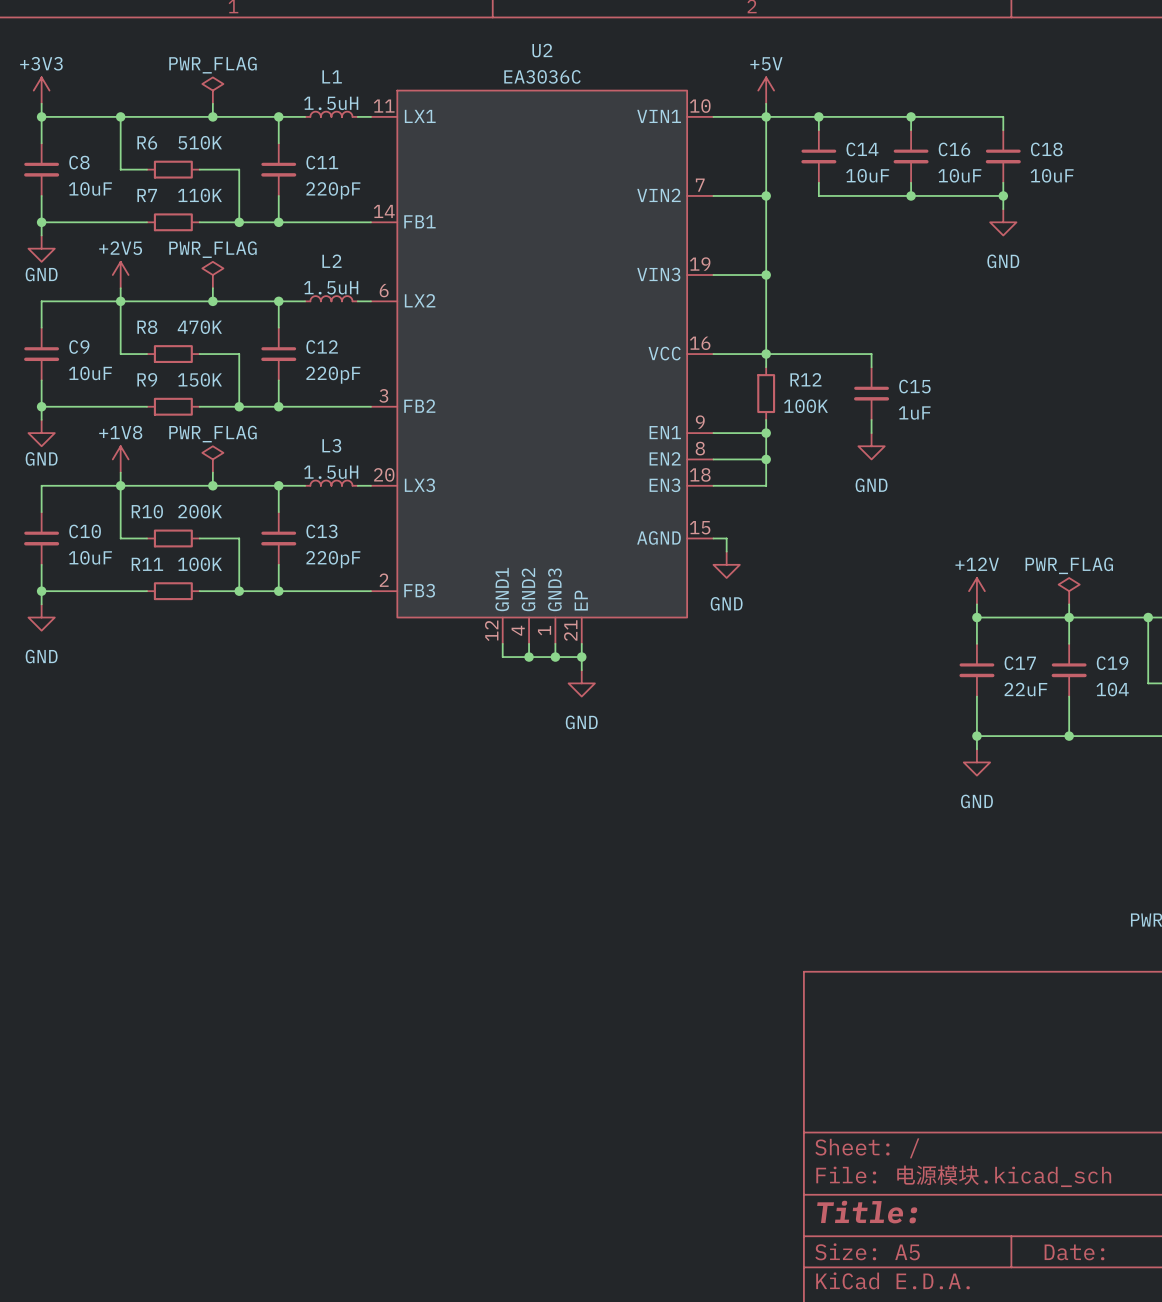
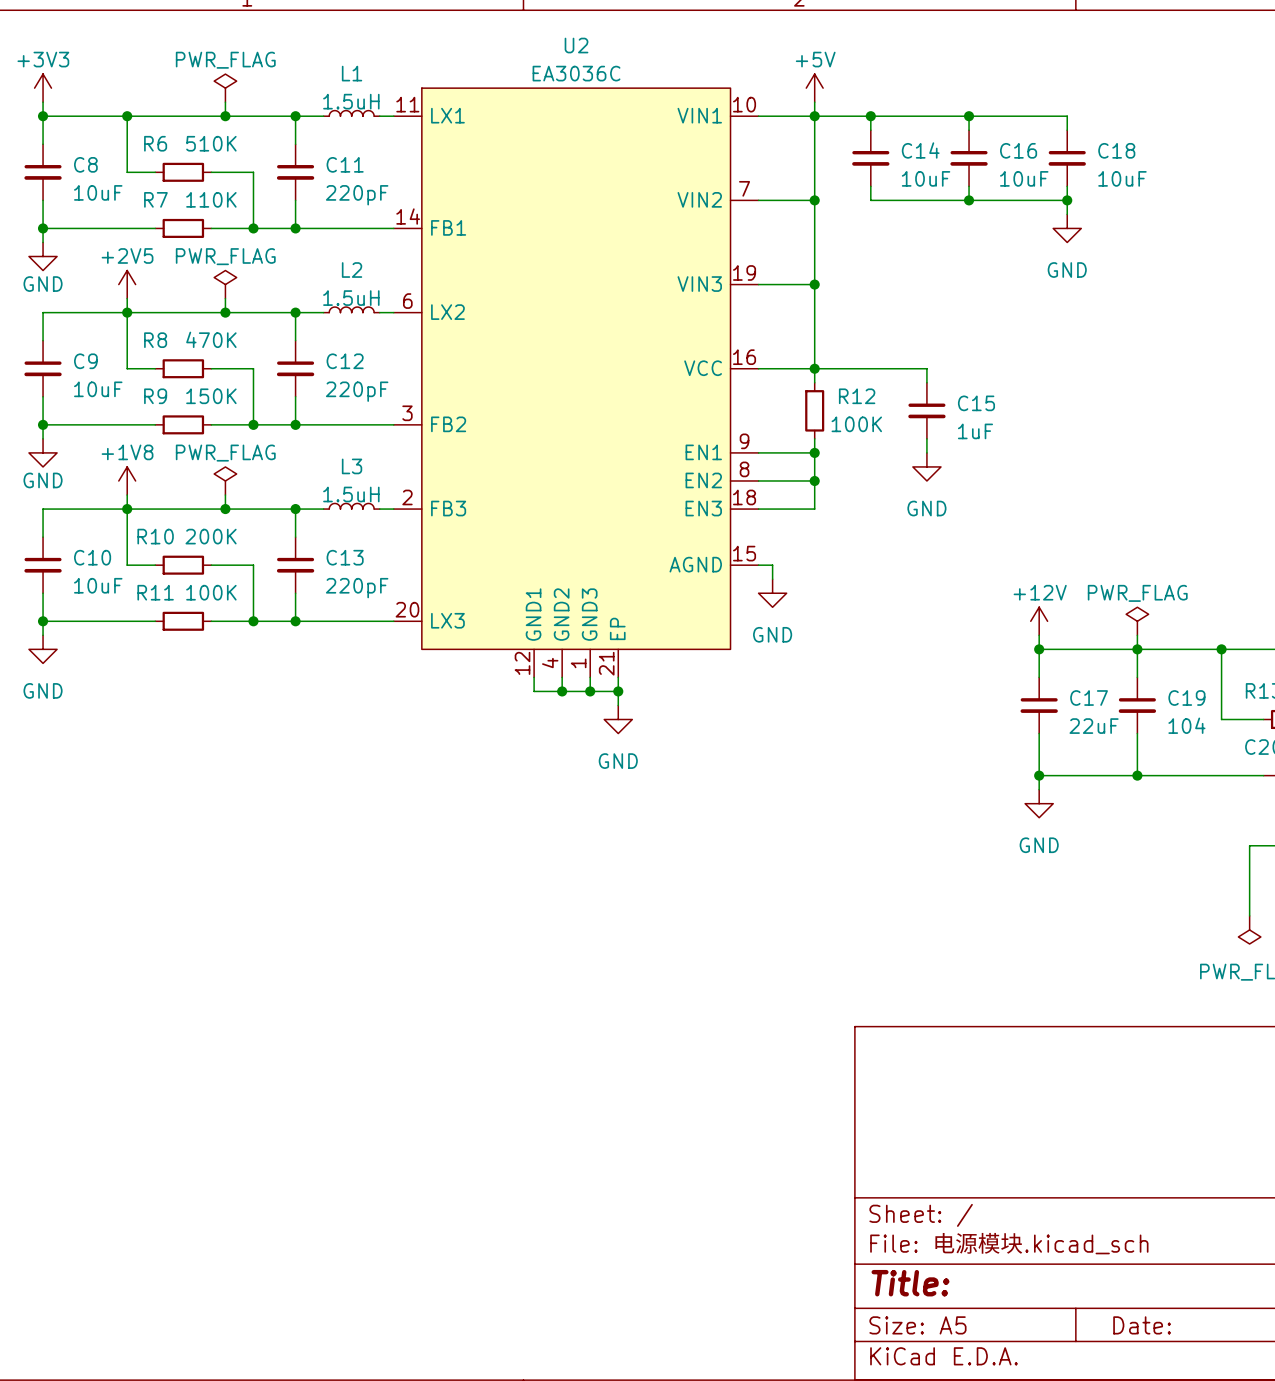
U2 pin number: 20 (384, 474) -> 2 (407, 497)
U2 pin name: LX3 (419, 485) -> FB3 (448, 508)
U2 pin number: 2 (384, 580) -> 20 (407, 609)
U2 pin name: FB3 (419, 590) -> LX3 (447, 620)

